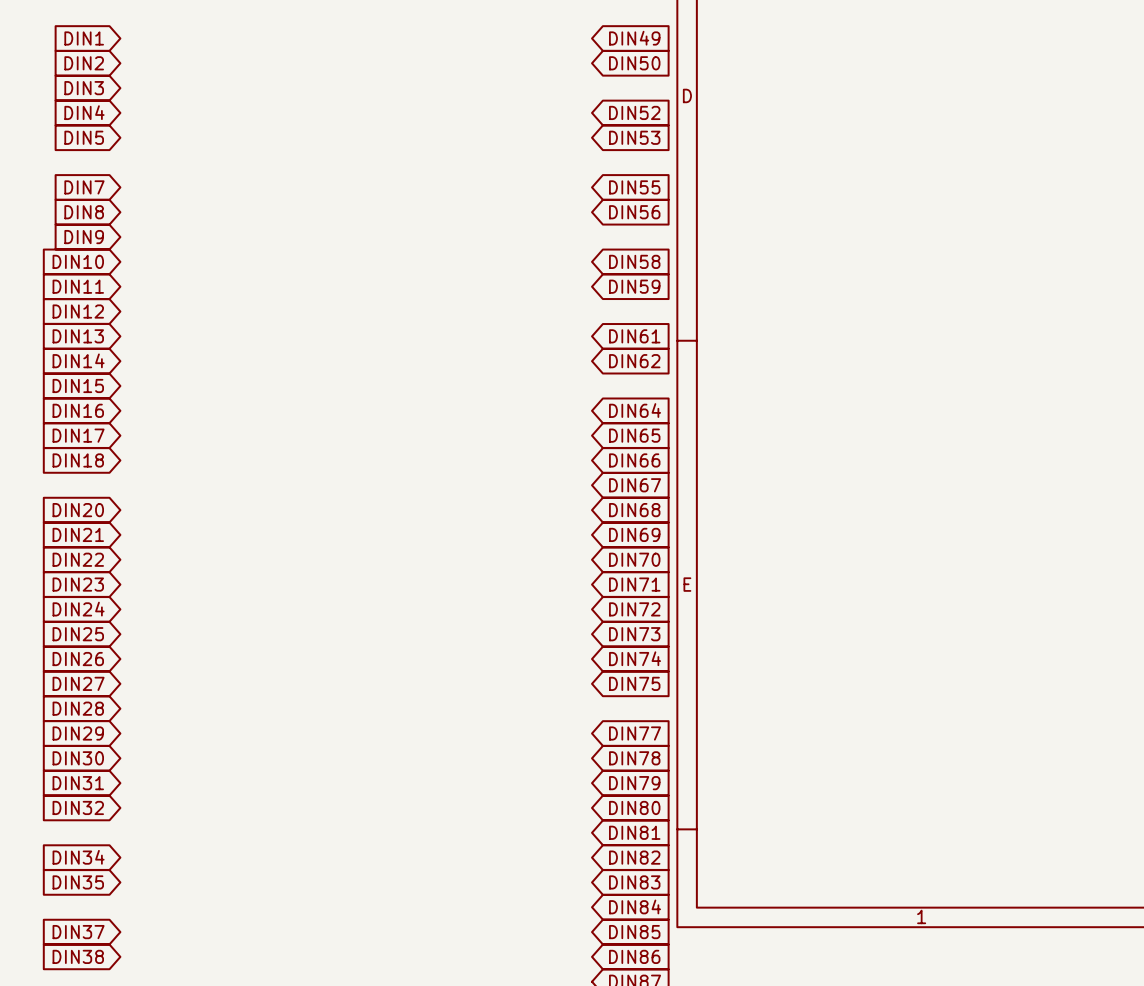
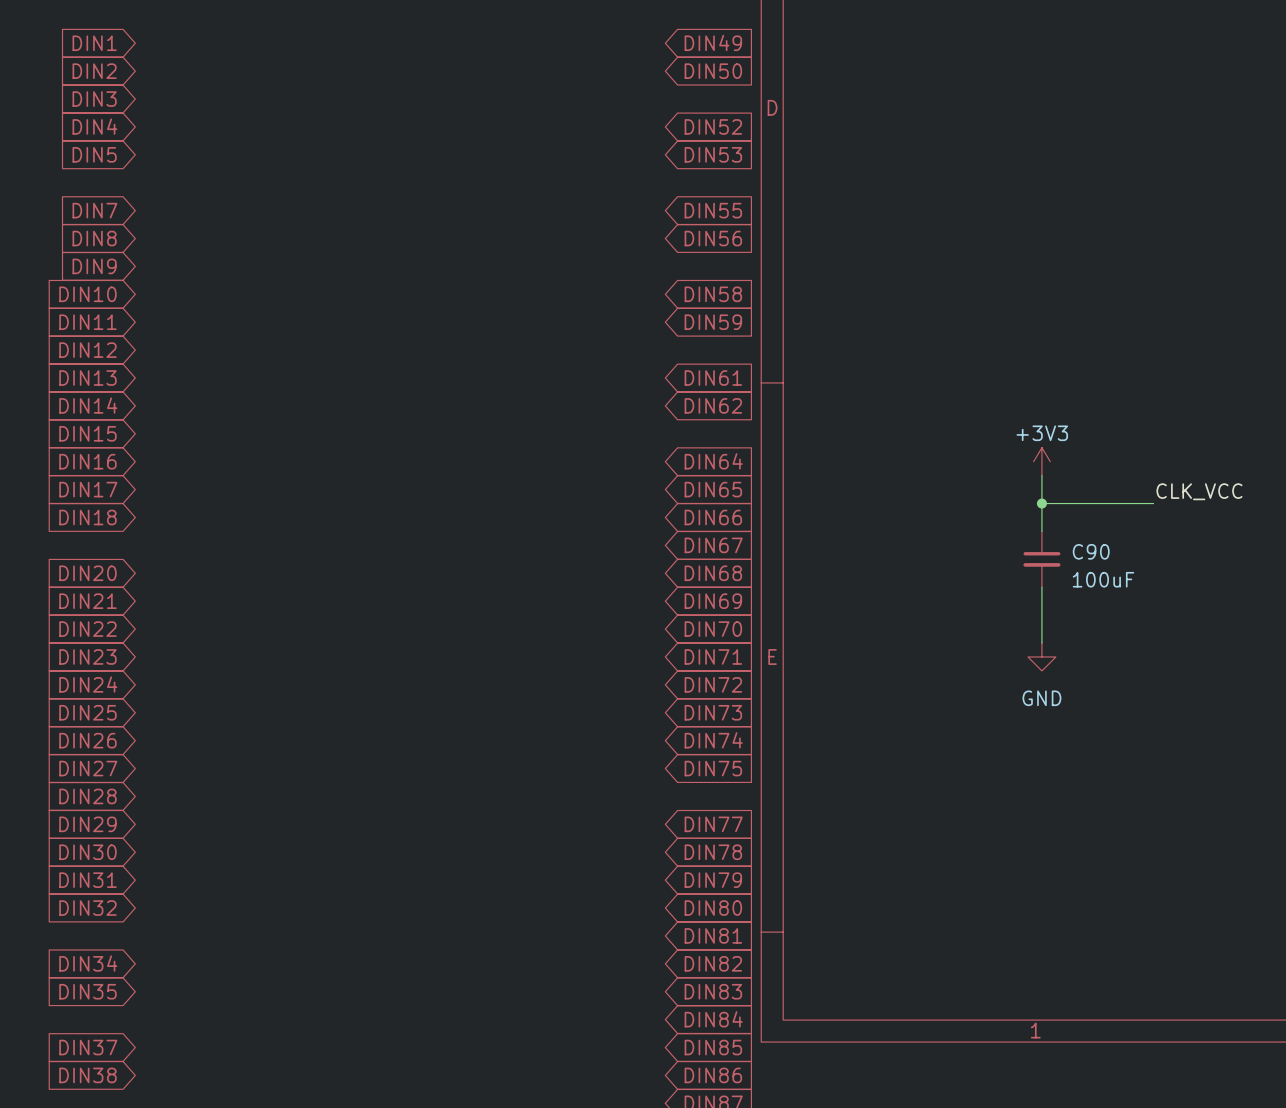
power symbol: none -> +3V3 (1041, 461)
wire: none -> (1041, 475) (1041, 531)
label: none -> CLK_VCC (1199, 491)
wire: none -> (1041, 503) (1153, 503)
junction: none -> (1041, 503)
C90: none -> 100uF (1041, 559)
wire: none -> (1041, 587) (1041, 643)
power symbol: none -> GND (1041, 656)

